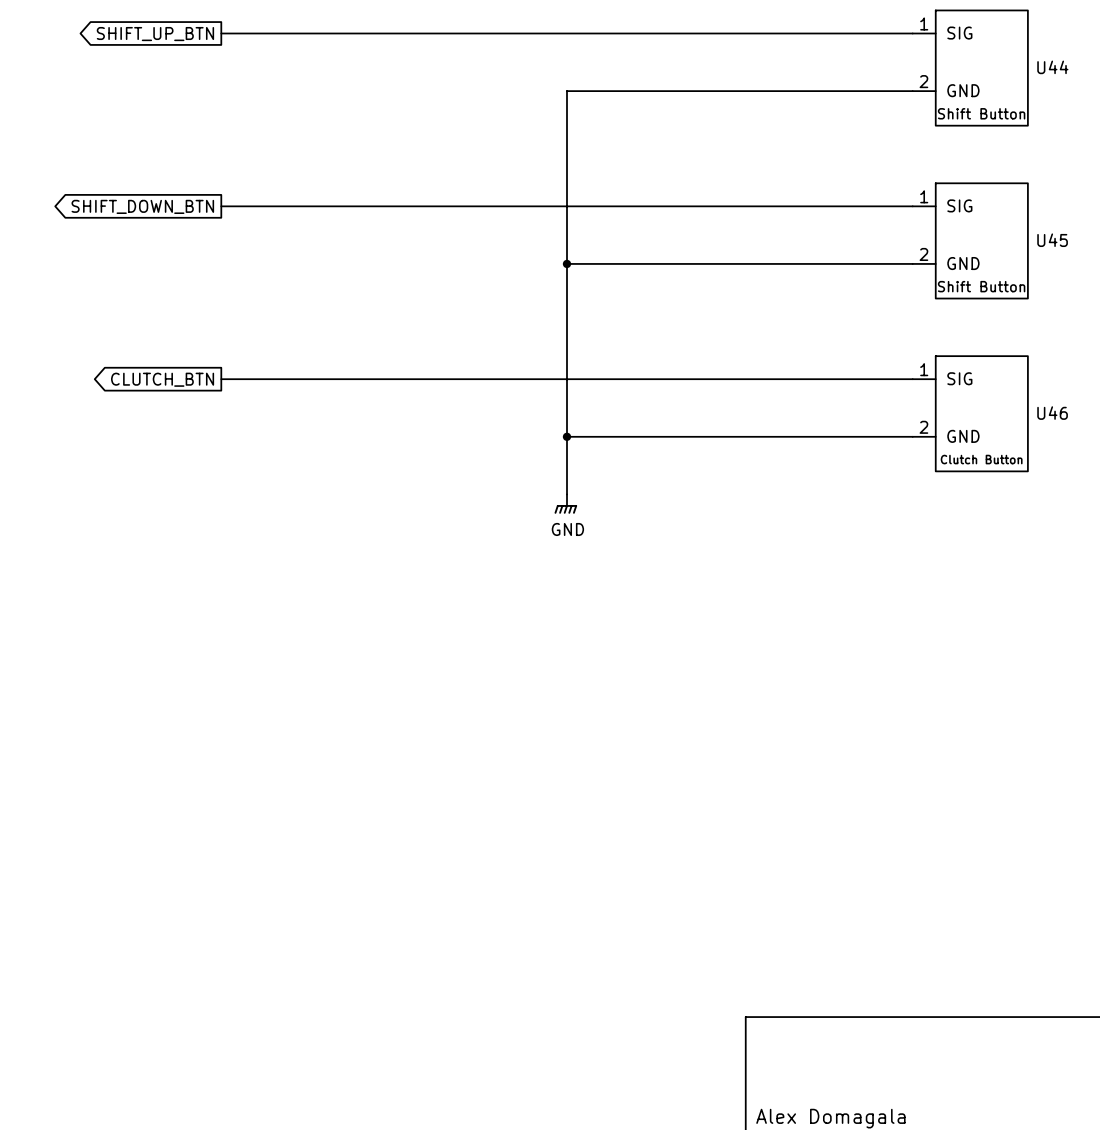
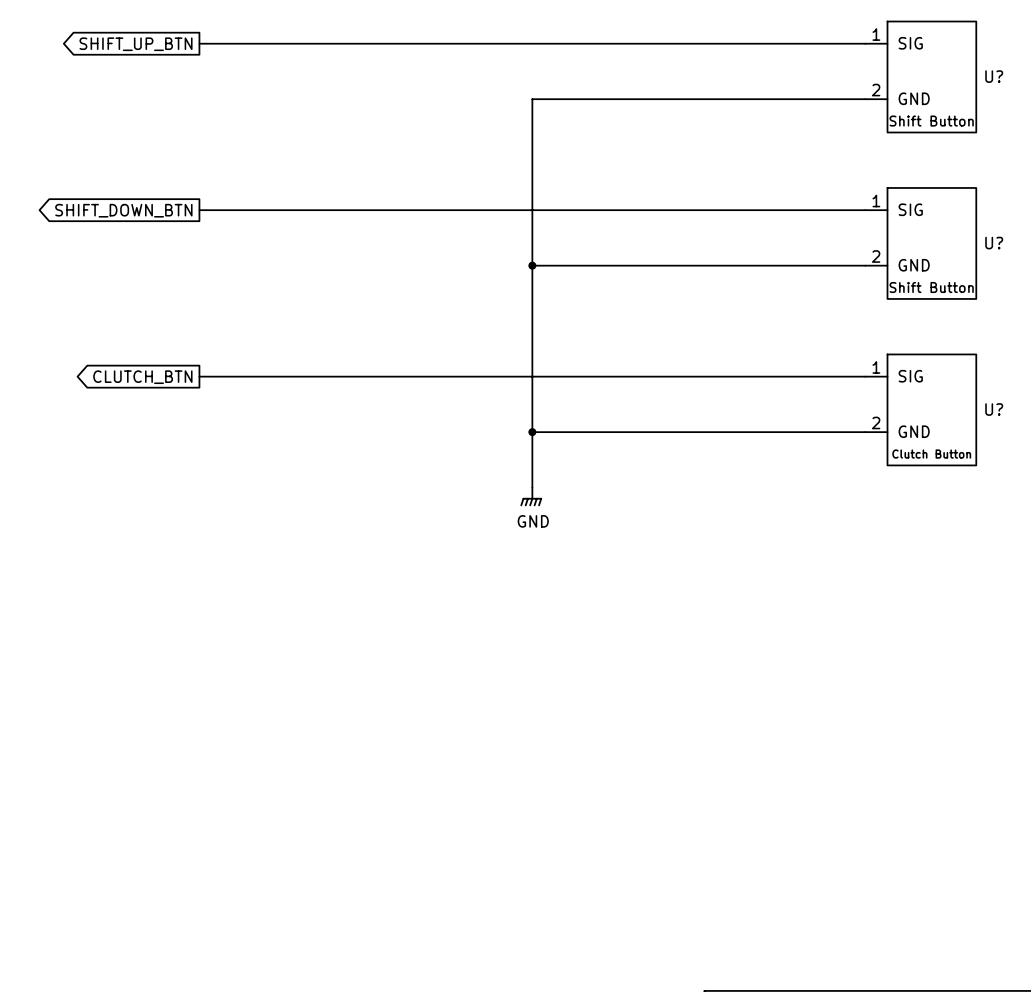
U44 name: U44 (1052, 67) -> U? (994, 76)
U45 name: U45 (1052, 240) -> U? (994, 243)
U46 name: U46 (1052, 413) -> U? (994, 409)

